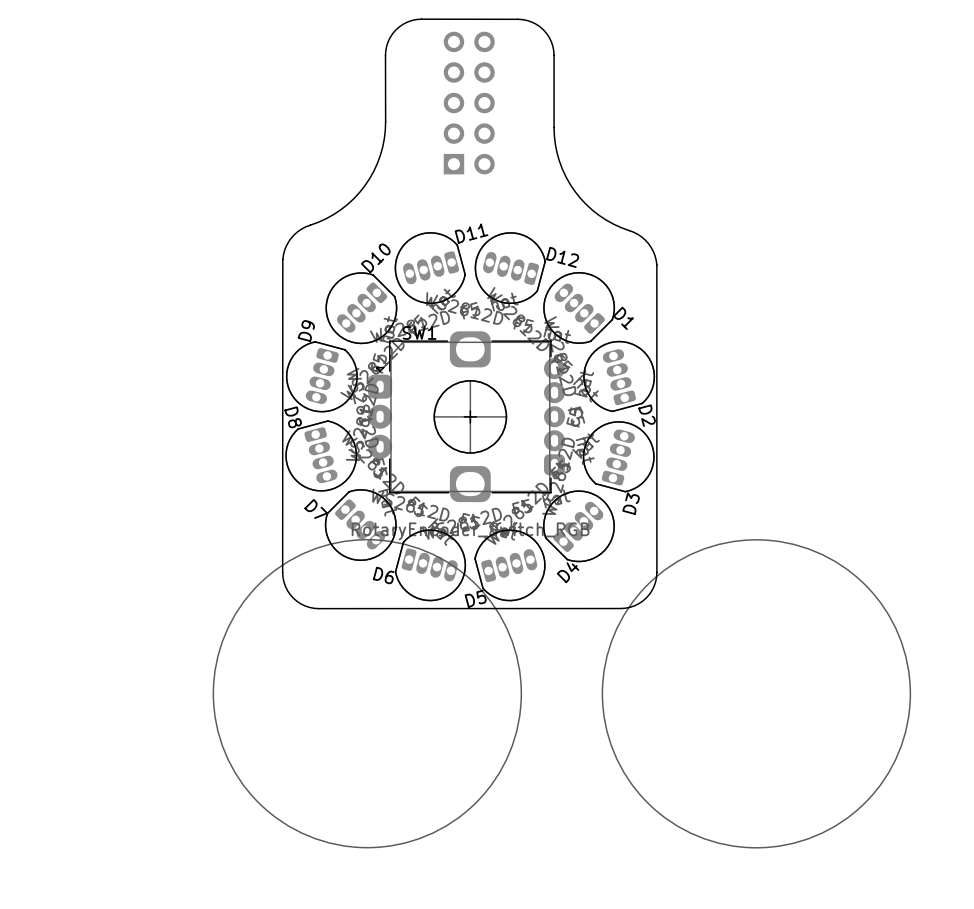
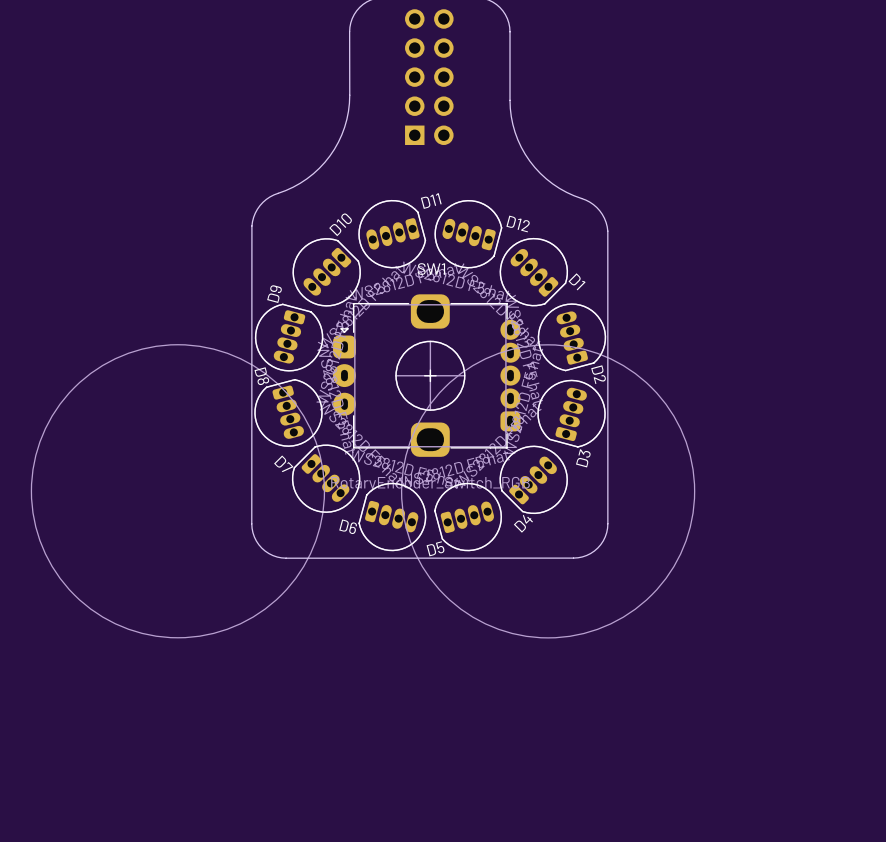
SW1 name position: SW1 (419, 332) -> SW1 (431, 269)
drawing: none -> [30, 344, 326, 639]
drawing: none -> [401, 344, 696, 639]
drawing: [212, 539, 522, 849] -> none
drawing: [601, 539, 911, 849] -> none

